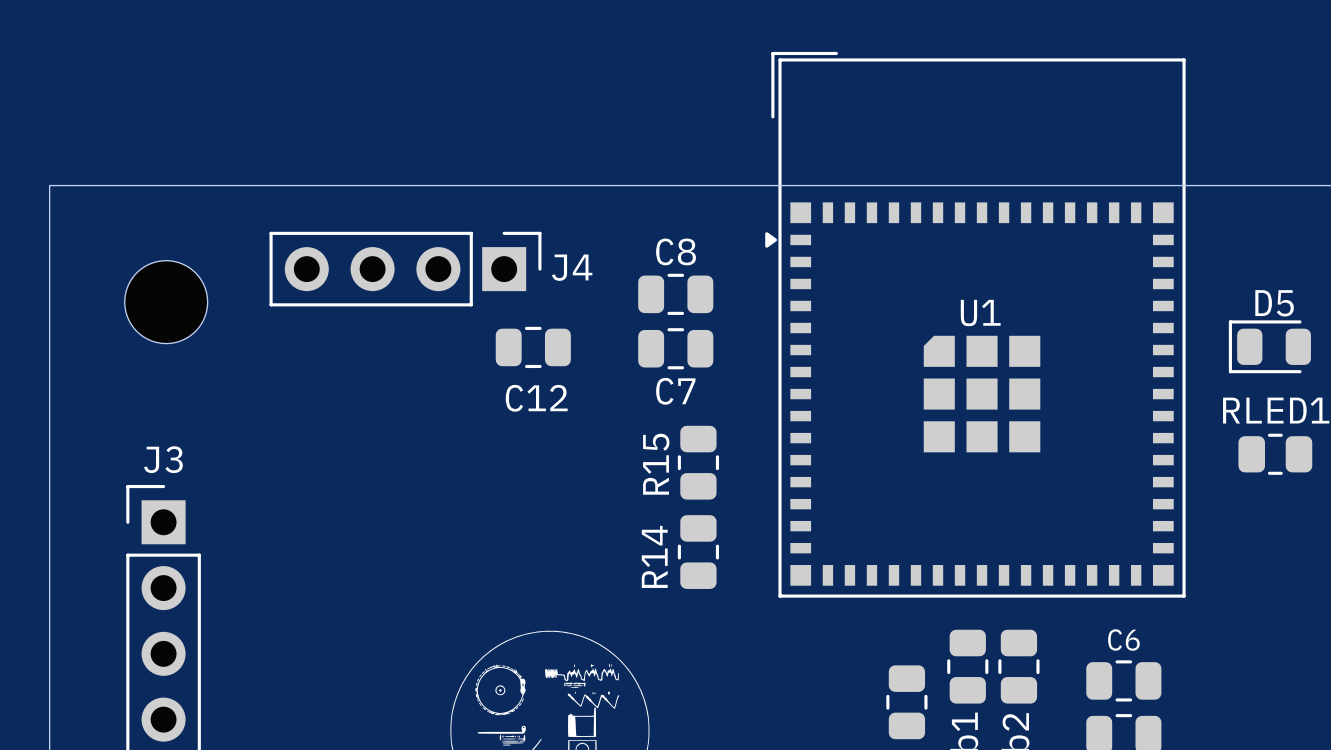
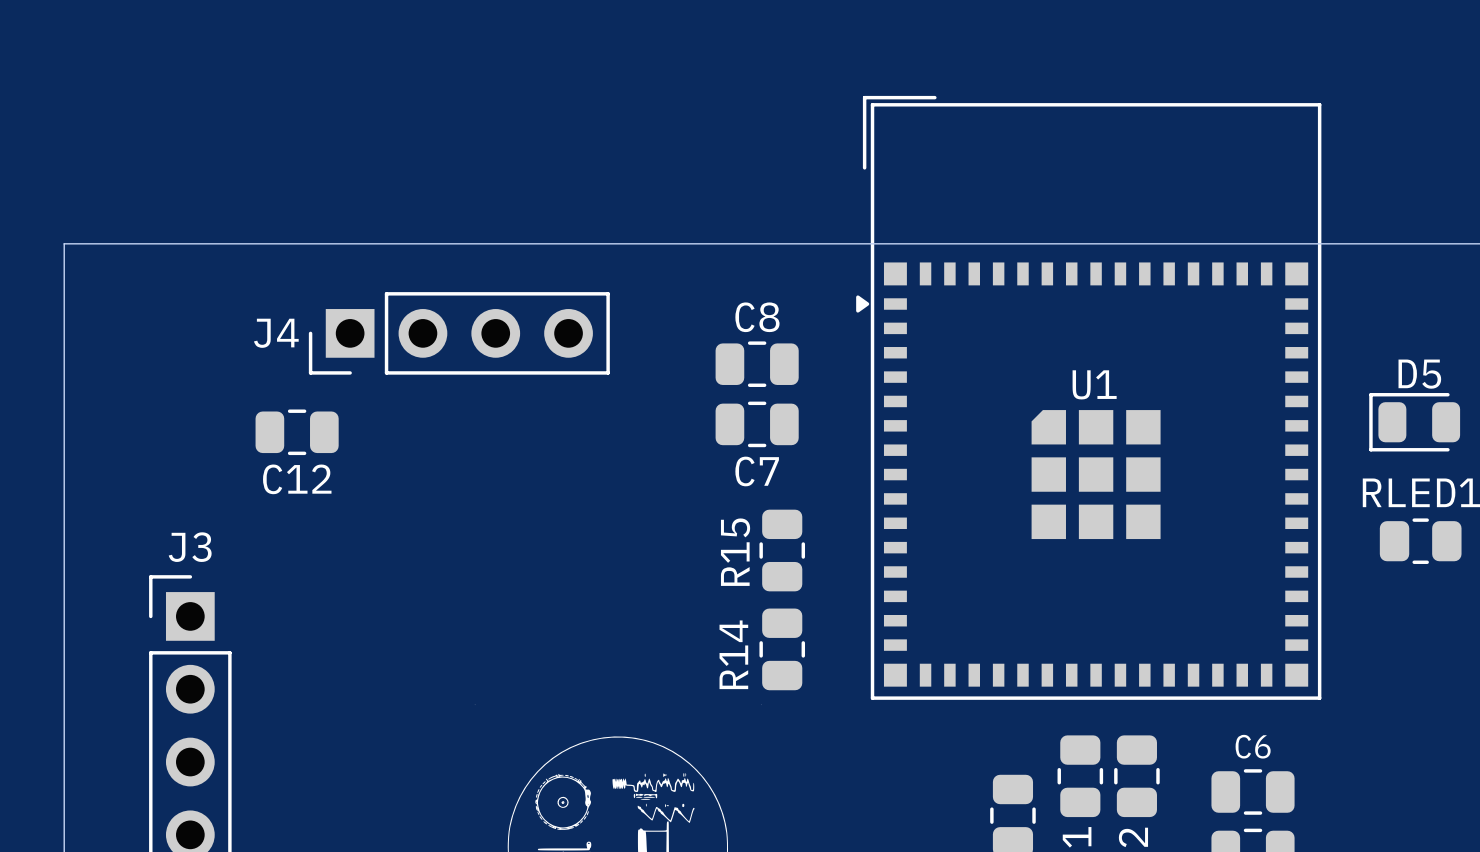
J4 rotation: 0° (405, 269) -> 180° (459, 333)
part: (166, 302) -> none
C12 position: (533, 347) -> (297, 432)
C12 name position: C12 (536, 398) -> C12 (297, 479)

